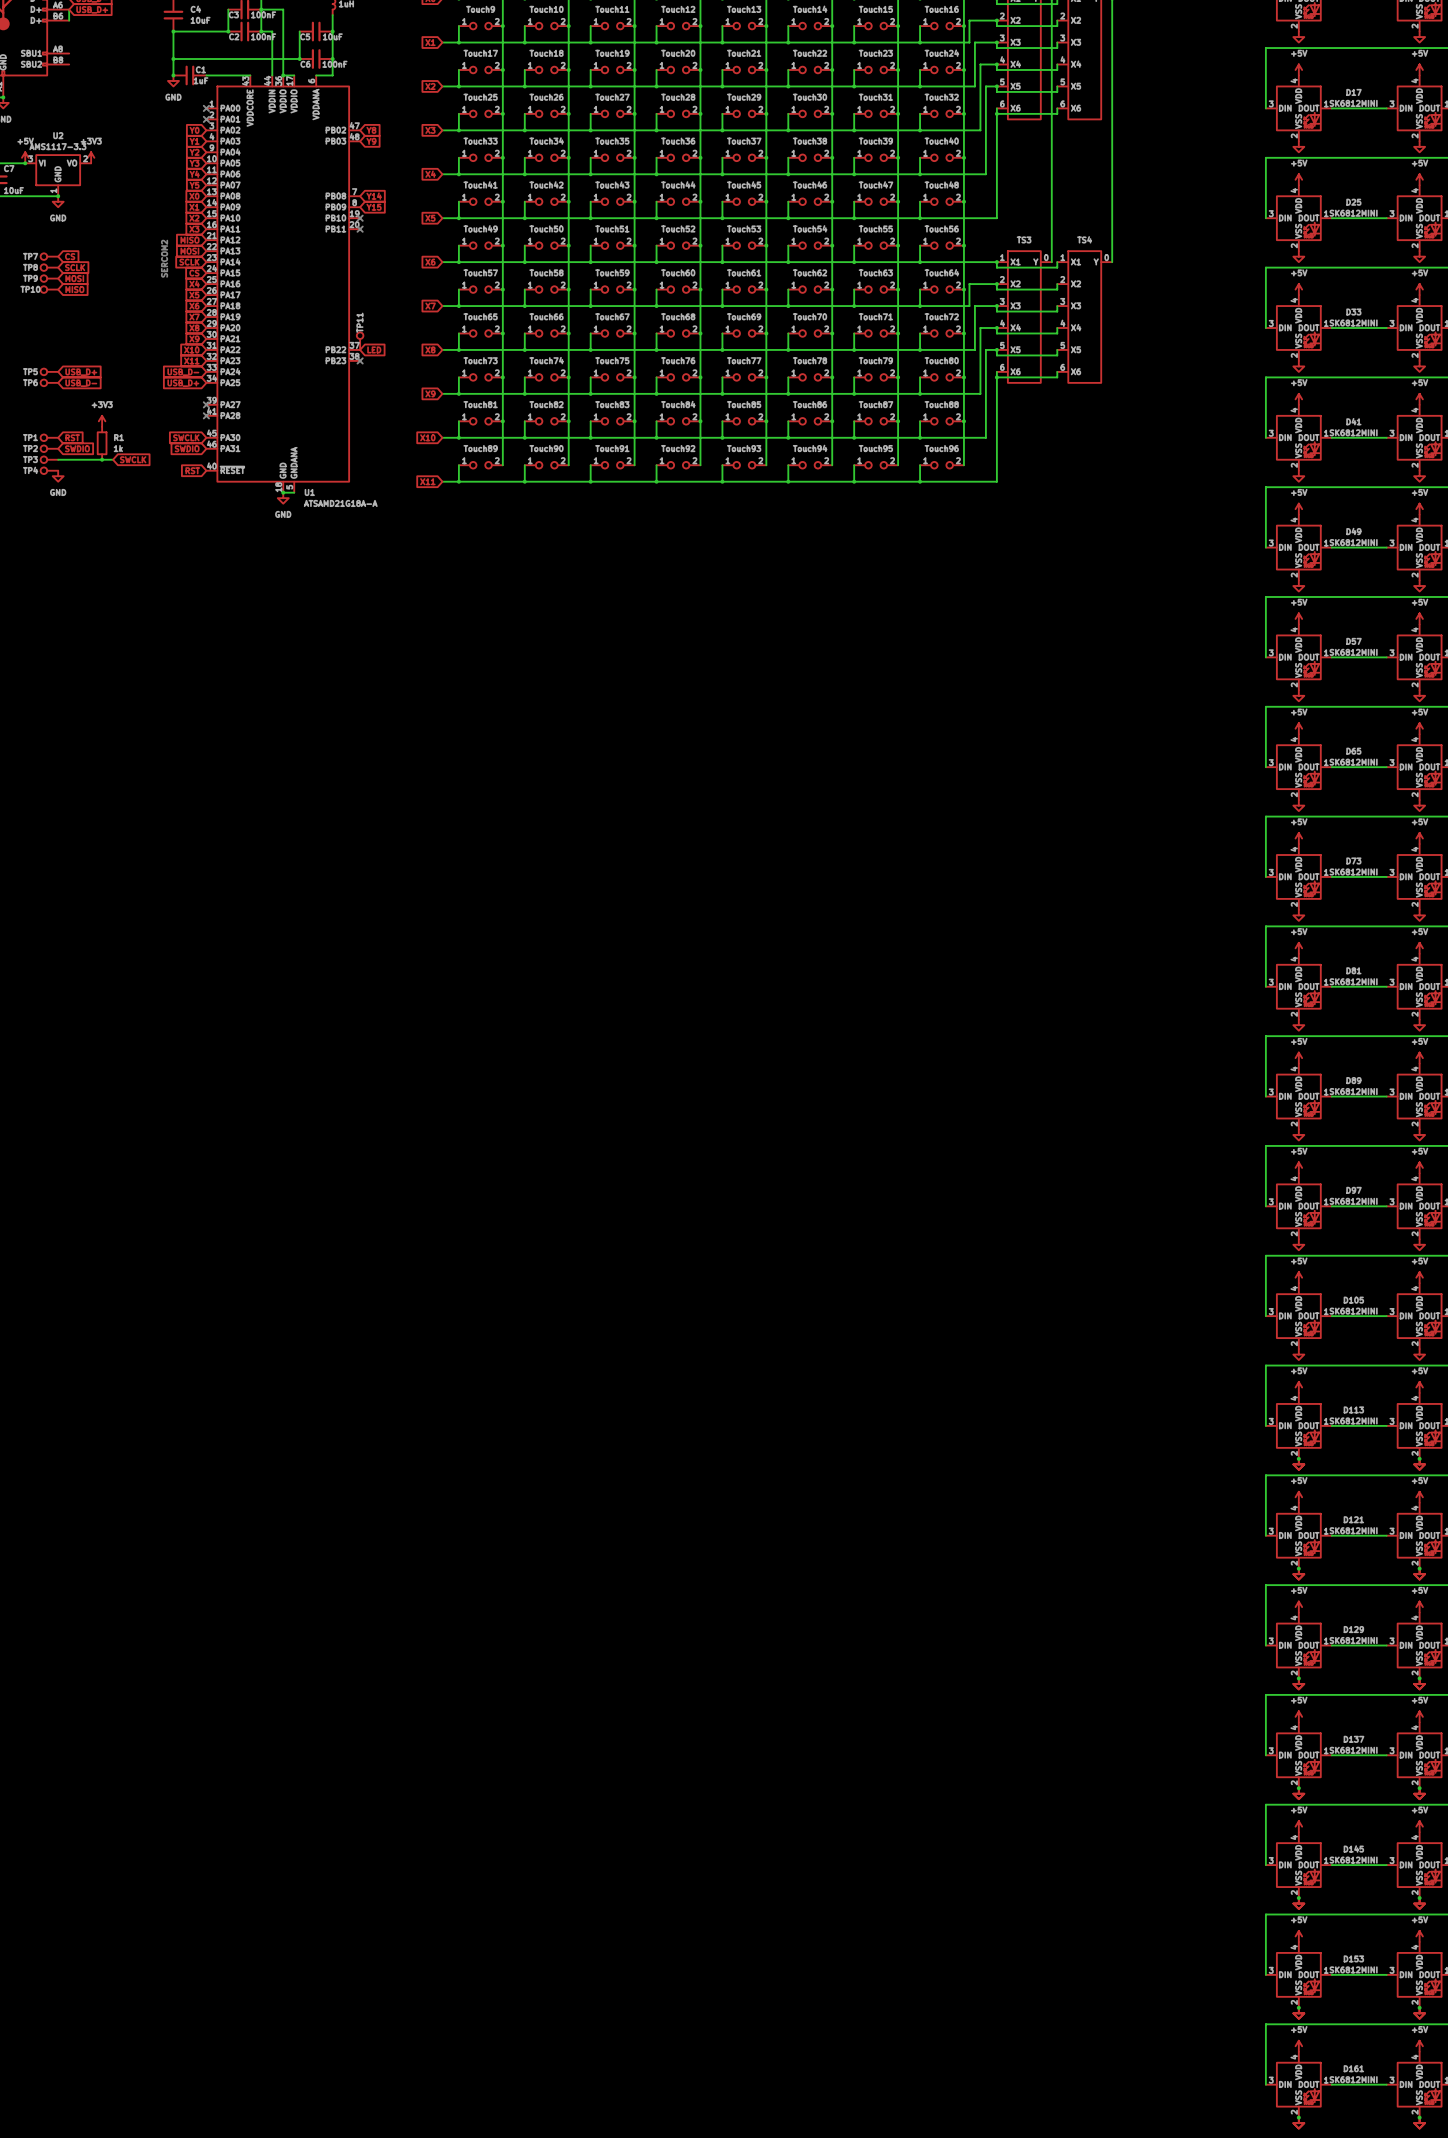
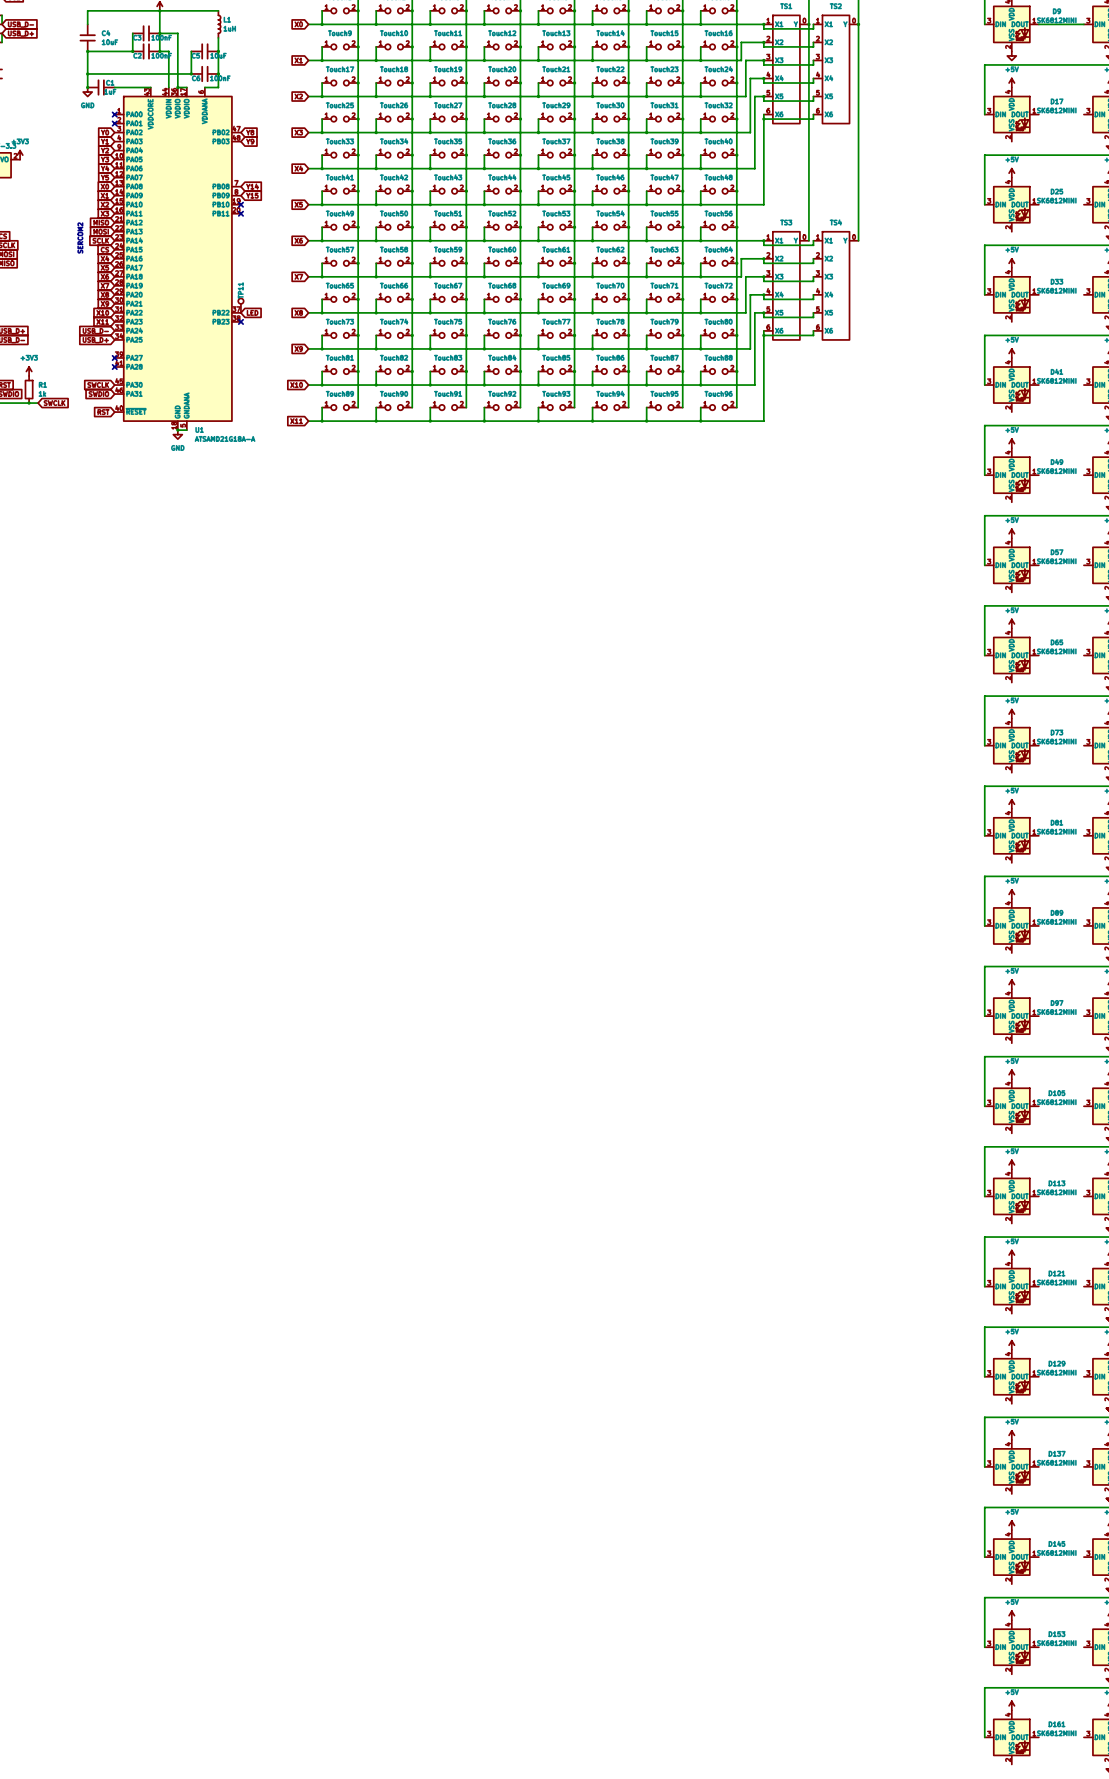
wire: (1331, 108) (1386, 108) -> none
power symbol: (1298, 146) -> none
wire: (1331, 218) (1386, 218) -> none
power symbol: (1298, 256) -> none
wire: (1331, 327) (1386, 327) -> none
power symbol: (1298, 366) -> none
wire: (1331, 437) (1386, 437) -> none
power symbol: (1298, 476) -> none
wire: (1331, 547) (1386, 547) -> none
power symbol: (1298, 586) -> none
wire: (1331, 657) (1386, 657) -> none
power symbol: (1298, 695) -> none
wire: (1331, 767) (1386, 767) -> none
power symbol: (1298, 805) -> none
wire: (1331, 876) (1386, 876) -> none
power symbol: (1298, 915) -> none
wire: (1331, 986) (1386, 986) -> none
power symbol: (1298, 1025) -> none
wire: (1331, 1096) (1386, 1096) -> none
power symbol: (1298, 1134) -> none
wire: (1331, 1206) (1386, 1206) -> none
power symbol: (1298, 1244) -> none
wire: (1331, 1316) (1386, 1316) -> none
power symbol: (1298, 1354) -> none
wire: (1331, 1425) (1386, 1425) -> none
junction: (1298, 1458) -> none
power symbol: (1298, 1464) -> none
wire: (1331, 1535) (1386, 1535) -> none
junction: (1298, 1568) -> none
power symbol: (1298, 1574) -> none
wire: (1331, 1645) (1386, 1645) -> none
junction: (1298, 1678) -> none
power symbol: (1298, 1683) -> none
wire: (1331, 1755) (1386, 1755) -> none
junction: (1298, 1788) -> none
power symbol: (1298, 1793) -> none
wire: (1331, 1865) (1386, 1865) -> none
junction: (1298, 1898) -> none
power symbol: (1298, 1903) -> none
wire: (1331, 1974) (1386, 1974) -> none
junction: (1298, 2007) -> none
power symbol: (1298, 2013) -> none
wire: (1331, 2084) (1386, 2084) -> none
junction: (1298, 2117) -> none
power symbol: (1298, 2123) -> none

